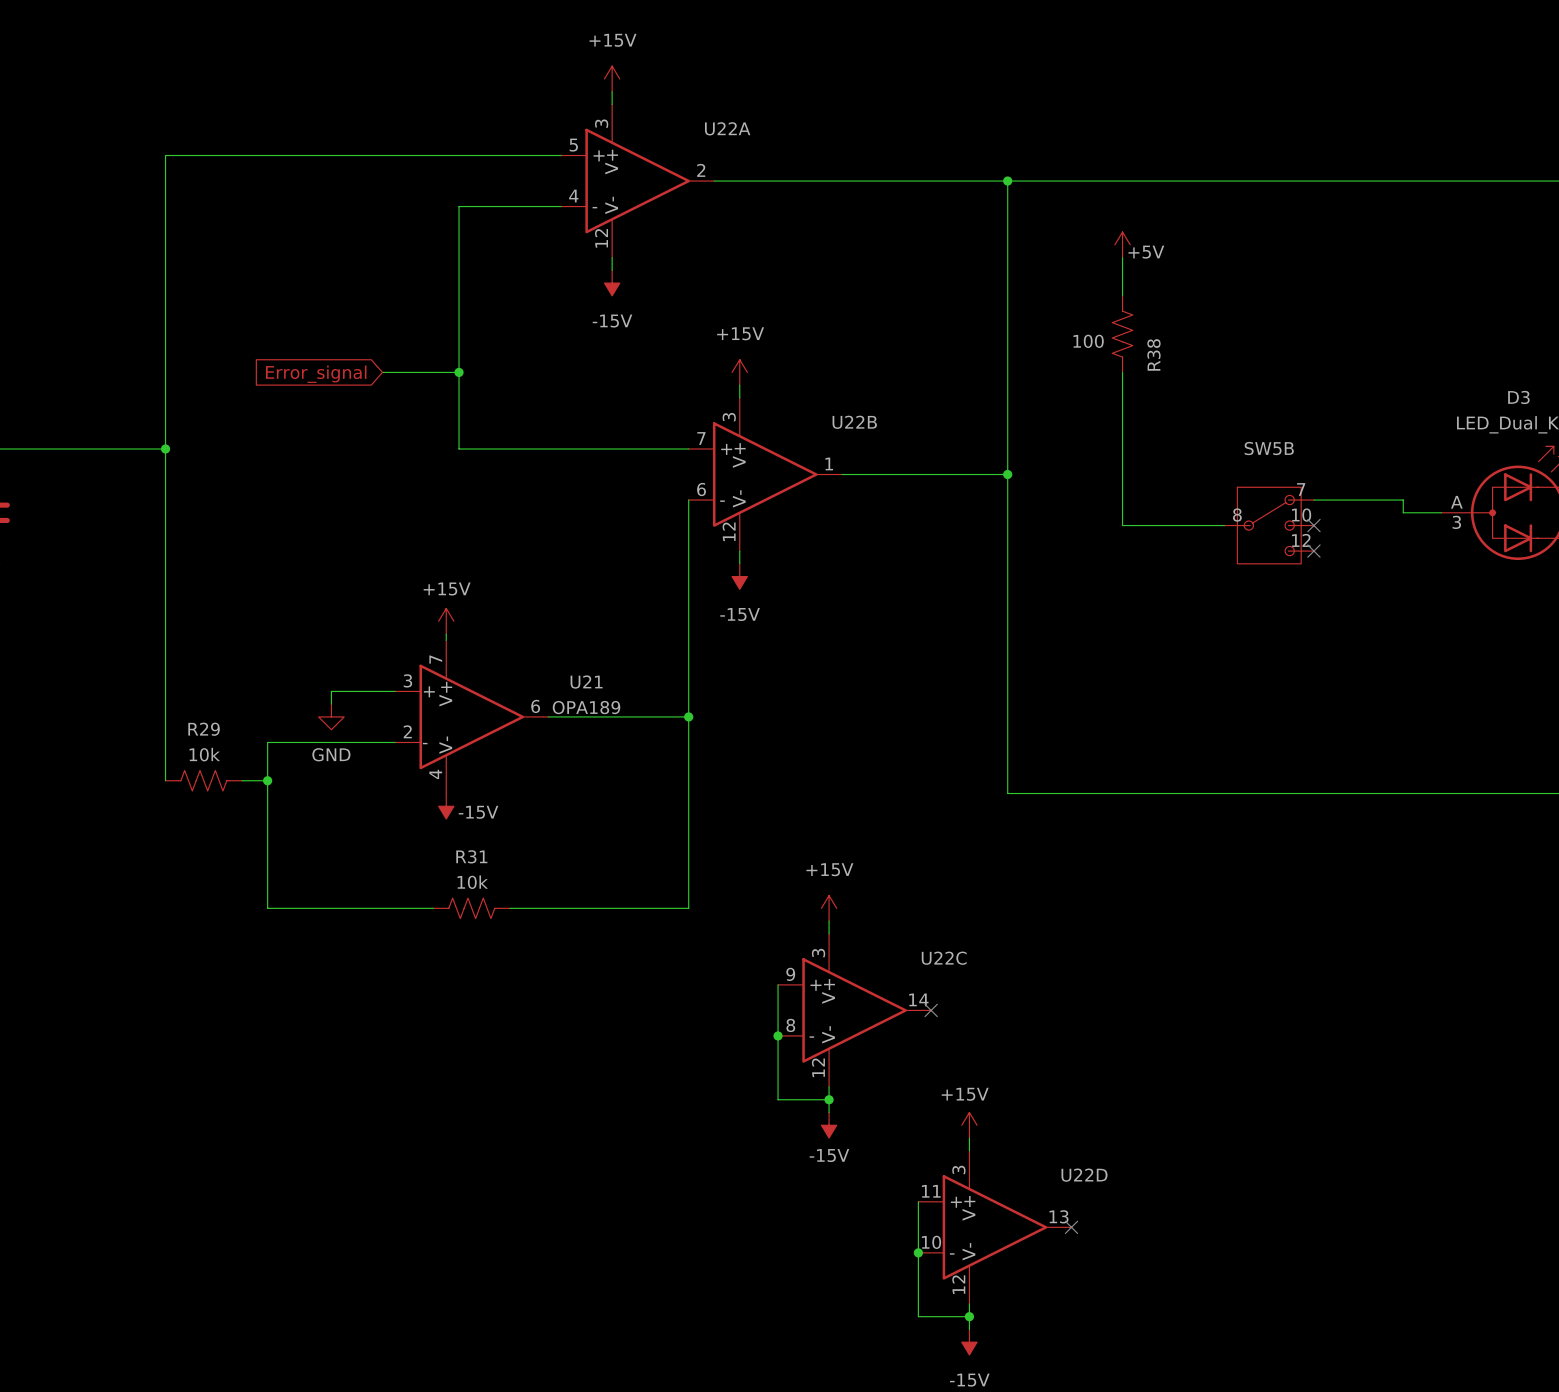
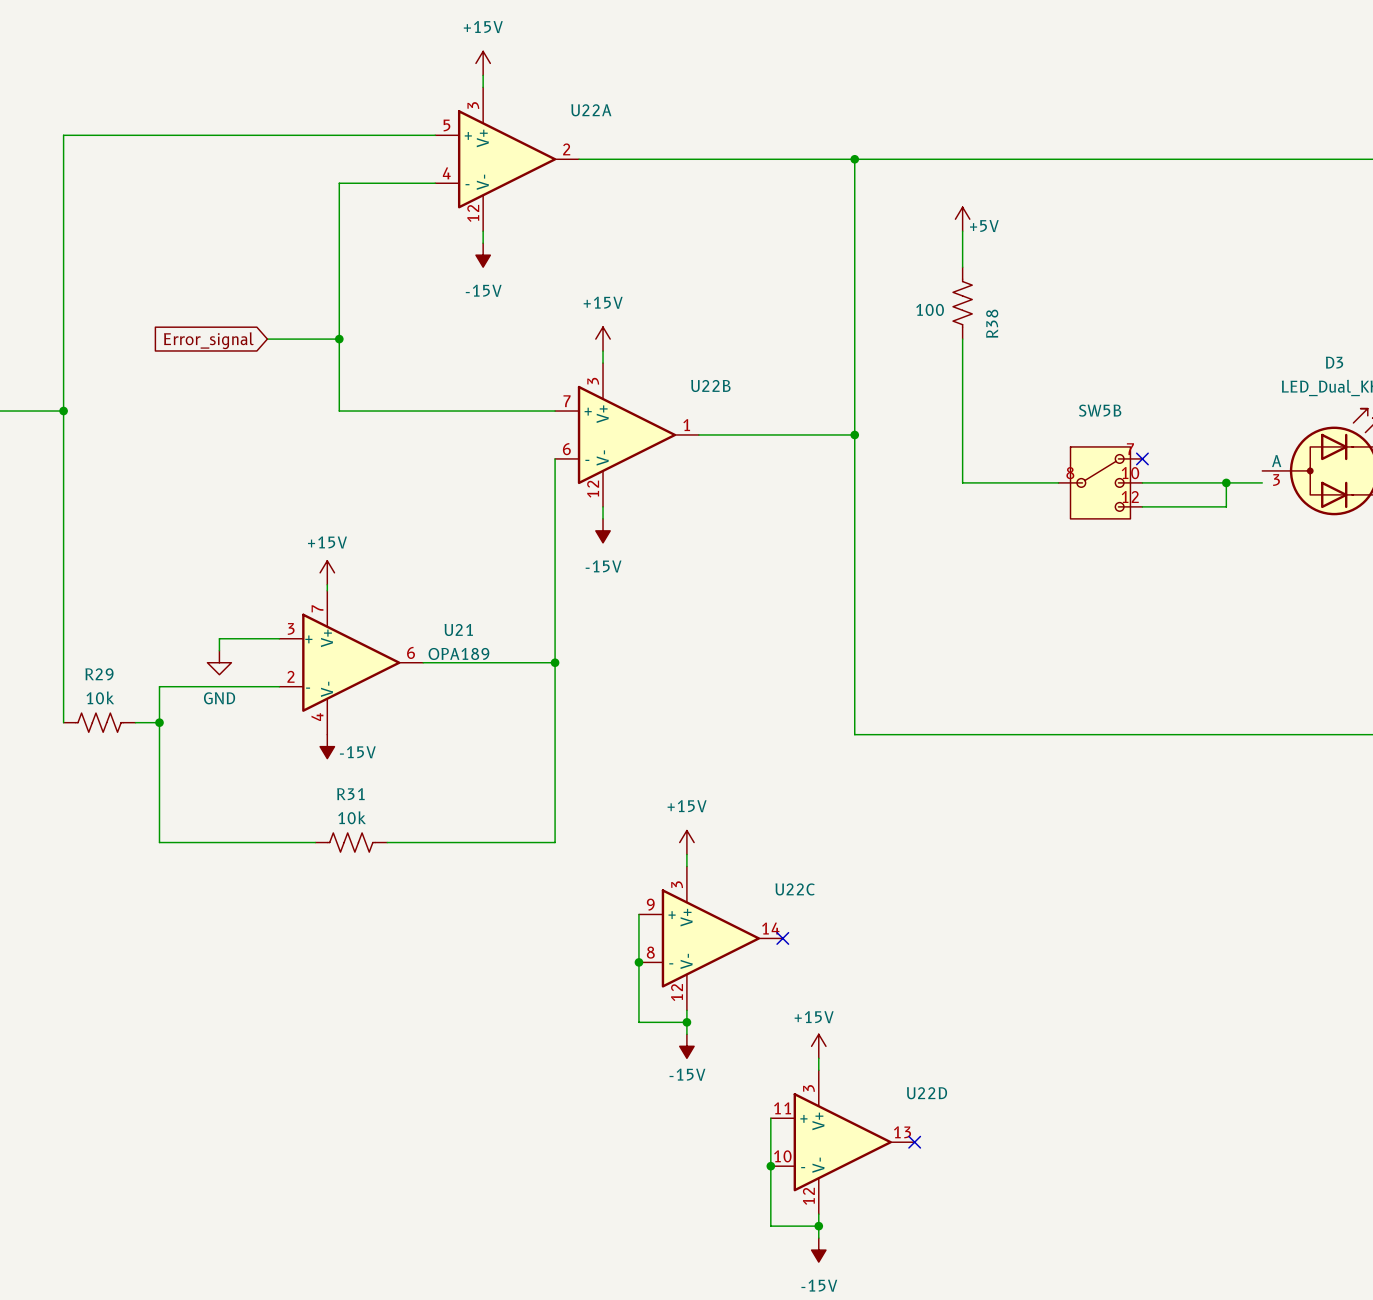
wire: (1313, 500) (1403, 500) (1403, 512) (1441, 512) -> none
no-connect mark: none -> (1142, 458)
wire: none -> (1142, 482) (1262, 482)
no-connect mark: (1313, 525) -> none
wire: none -> (1226, 482) (1226, 506) (1142, 506)
junction: none -> (1226, 482)
no-connect mark: (1313, 551) -> none

